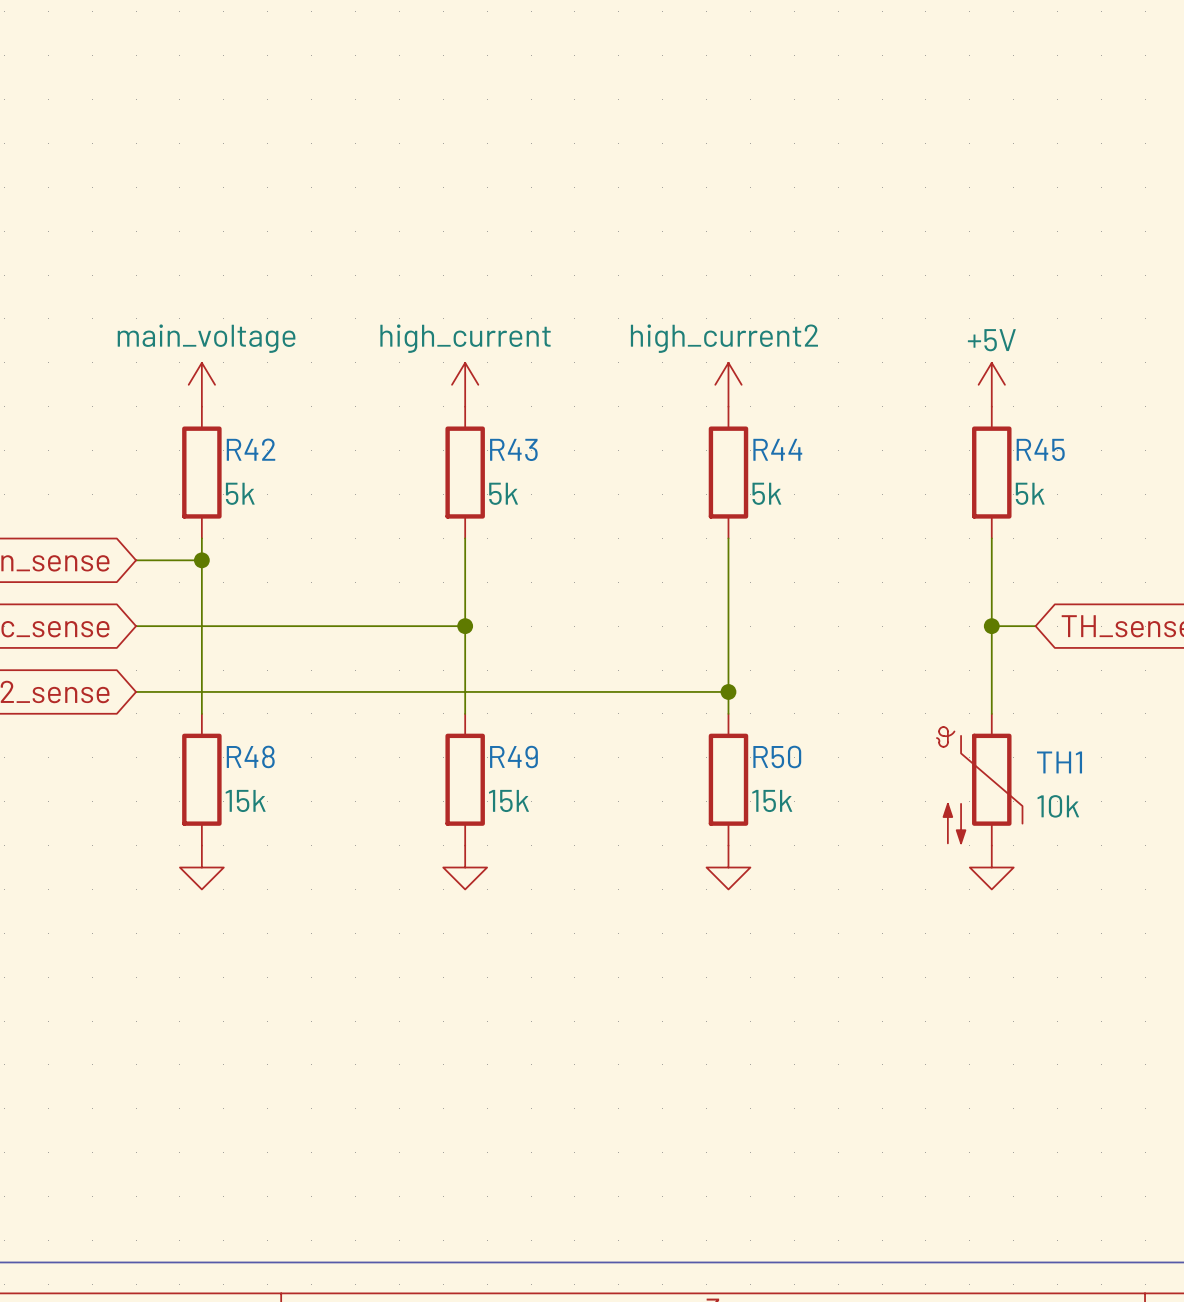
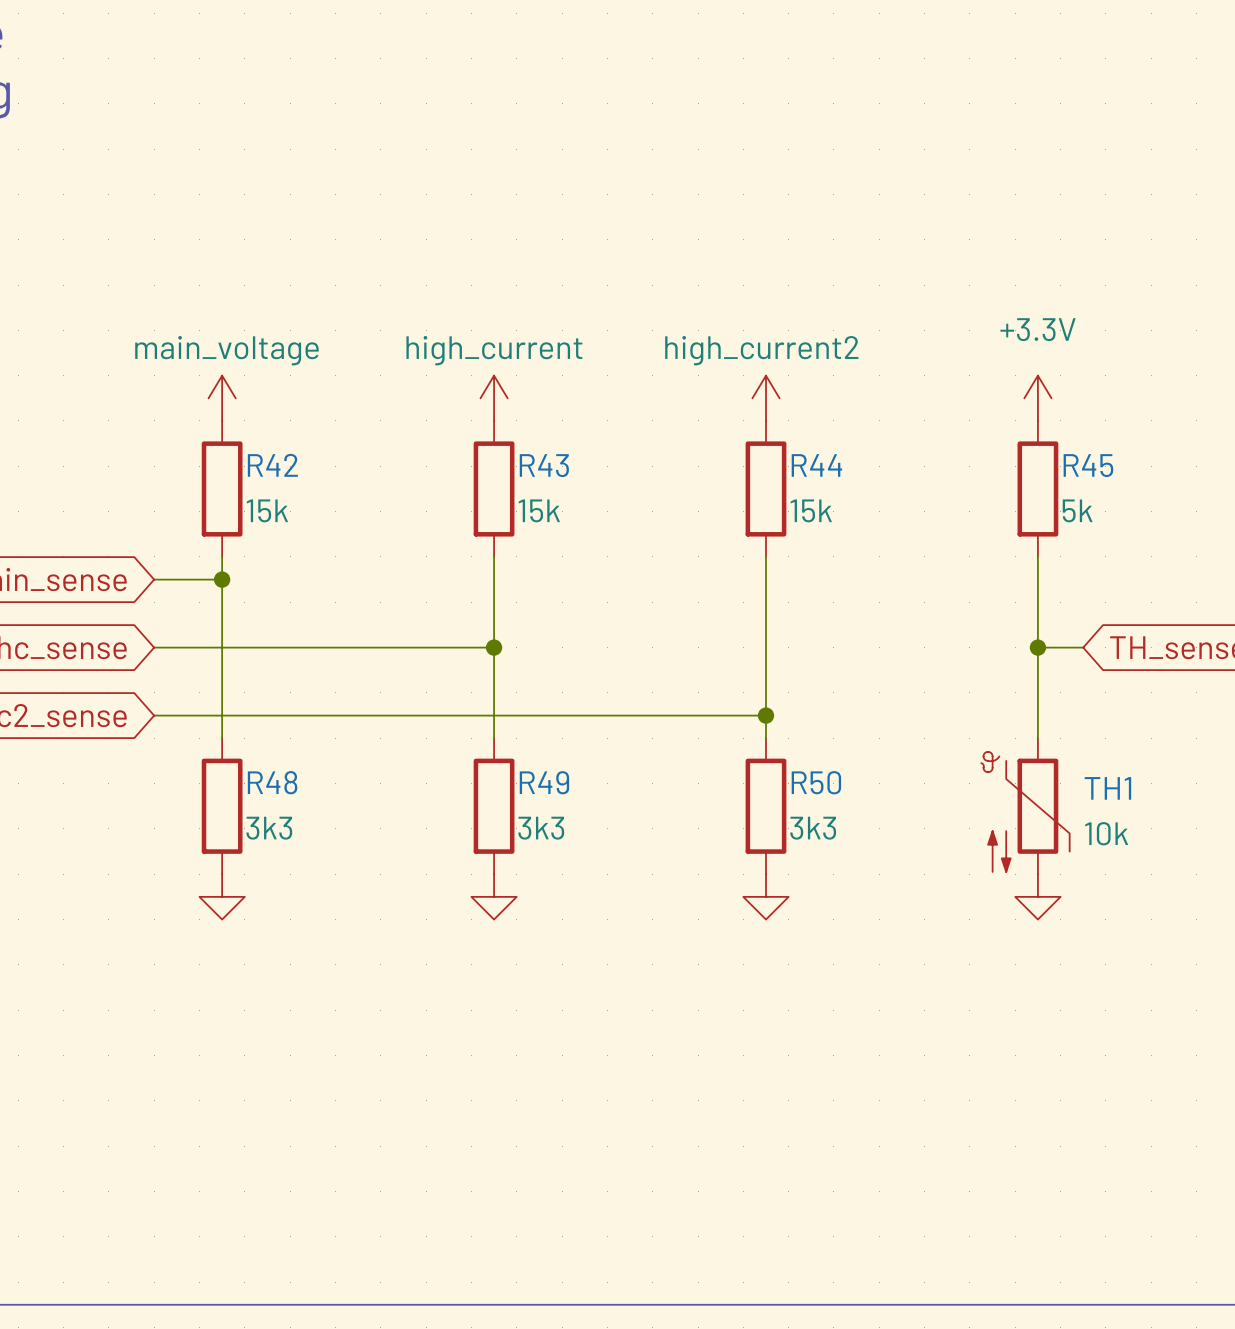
power symbol: +5V (991, 384) -> +3.3V (1037, 398)
R42 value: 5k (240, 493) -> 15k (267, 510)
R43 value: 5k (503, 493) -> 15k (539, 510)
R44 value: 5k (766, 493) -> 15k (811, 510)
R48 value: 15k (245, 800) -> 3k3 (269, 828)
R49 value: 15k (508, 800) -> 3k3 (541, 828)
R50 value: 15k (772, 800) -> 3k3 (813, 828)

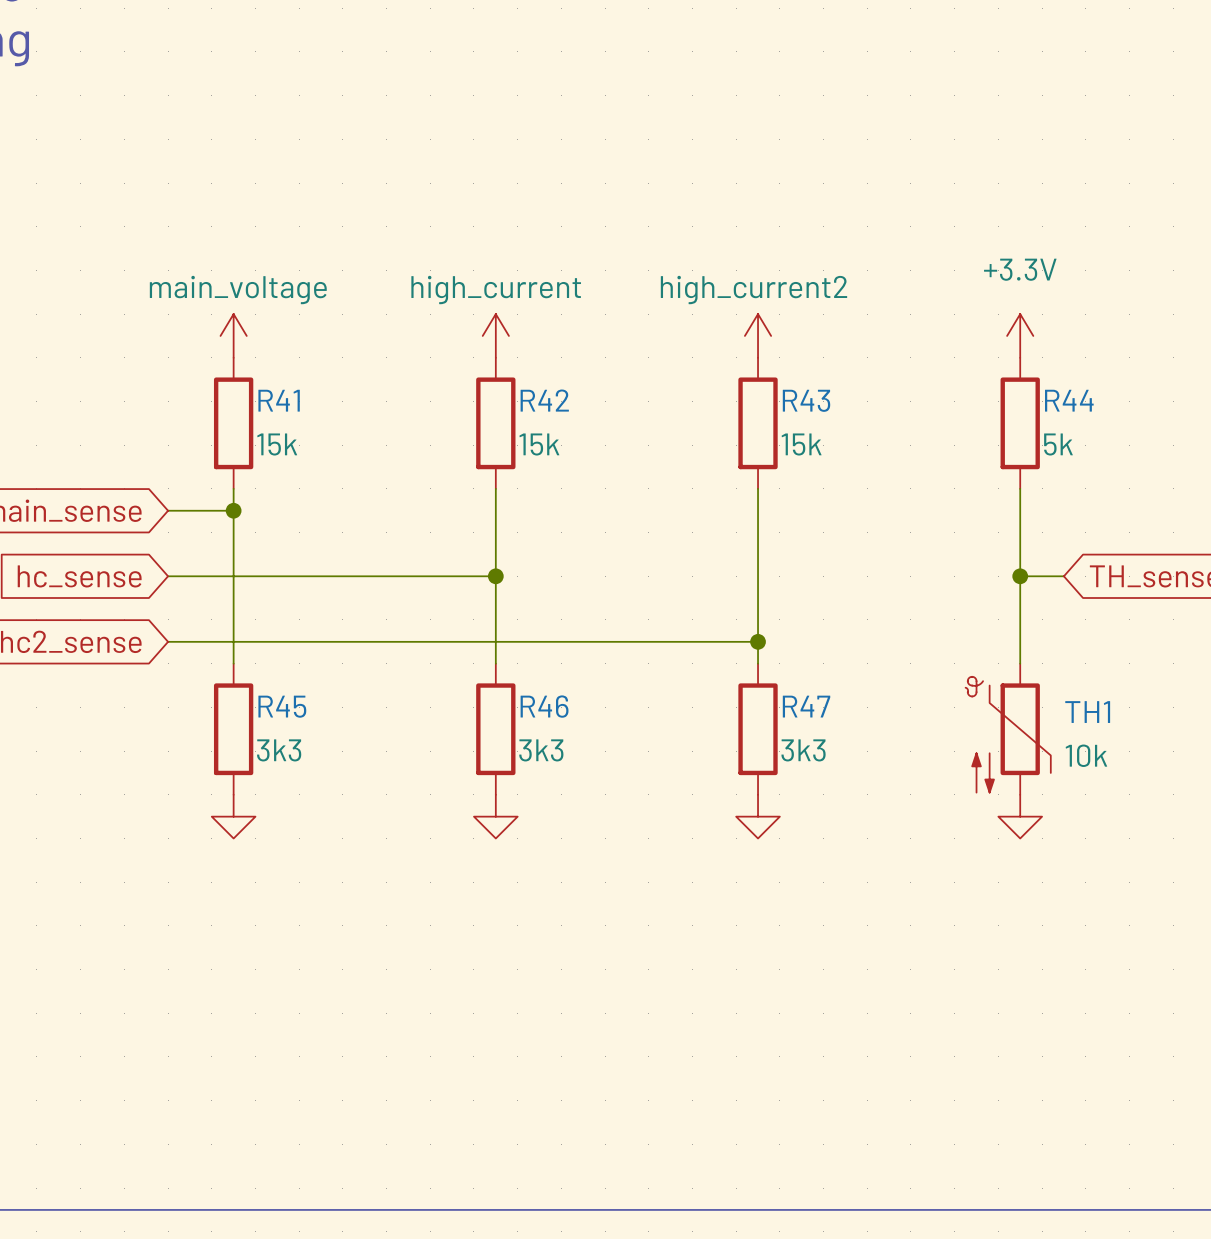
R42 name: R42 (272, 465) -> R41 (279, 400)
R43 name: R43 (544, 465) -> R42 (544, 400)
R44 name: R44 (816, 465) -> R43 (806, 400)
R45 name: R45 (1088, 465) -> R44 (1069, 400)
R48 name: R48 (272, 782) -> R45 (282, 706)
R49 name: R49 (544, 782) -> R46 (544, 706)
R50 name: R50 (816, 782) -> R47 (806, 706)

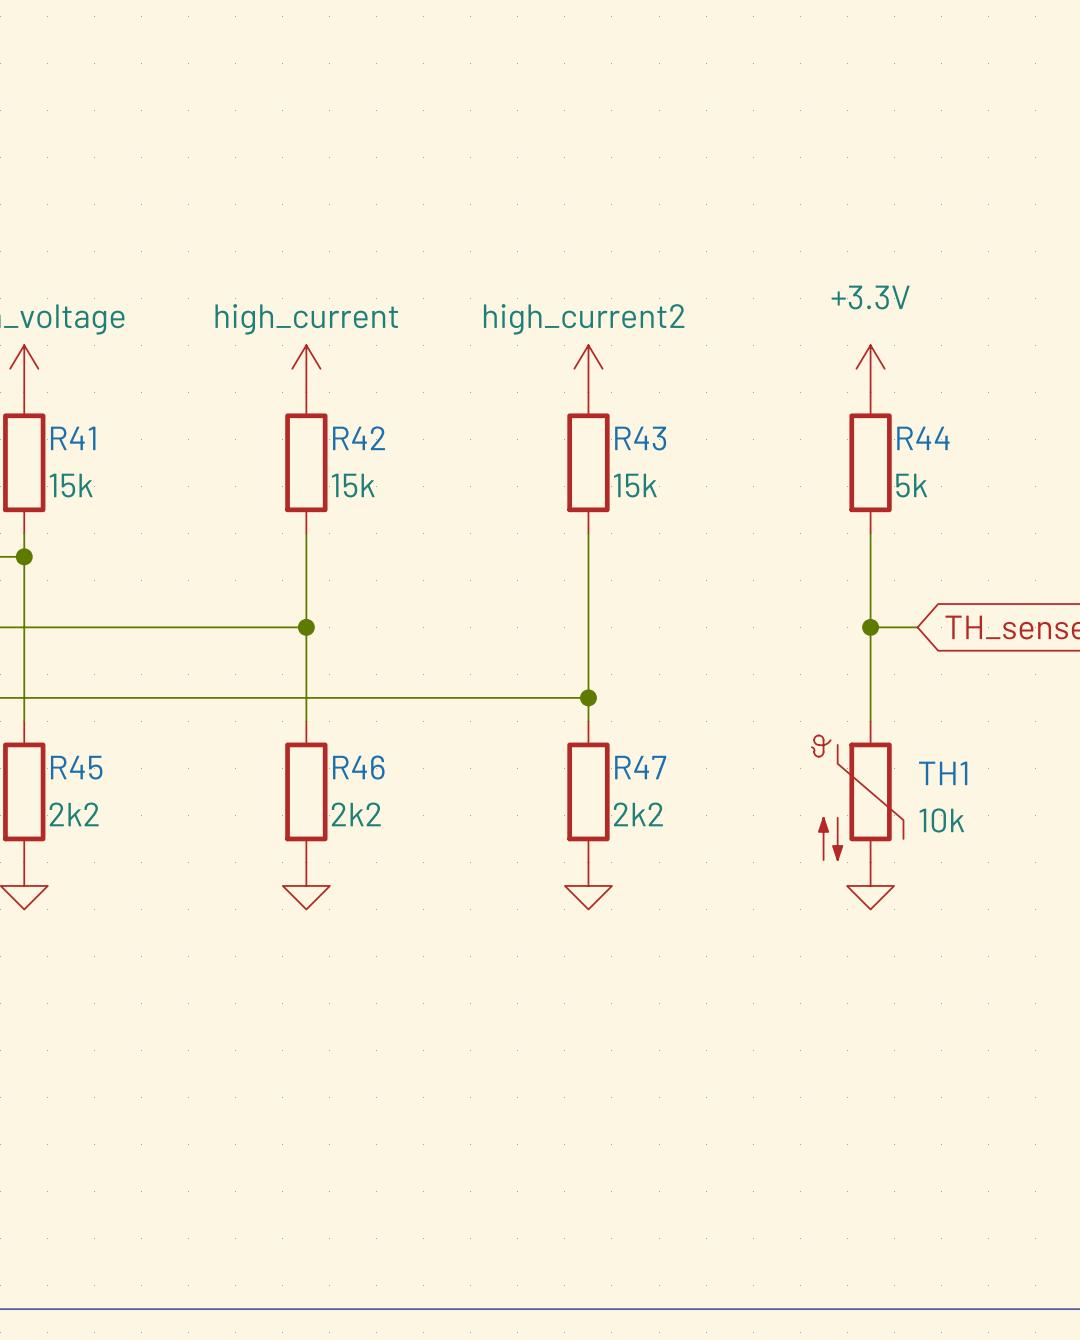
R45 value: 3k3 (279, 750) -> 2k2 (74, 814)
R46 value: 3k3 (541, 750) -> 2k2 (356, 814)
R47 value: 3k3 (803, 750) -> 2k2 (638, 814)

